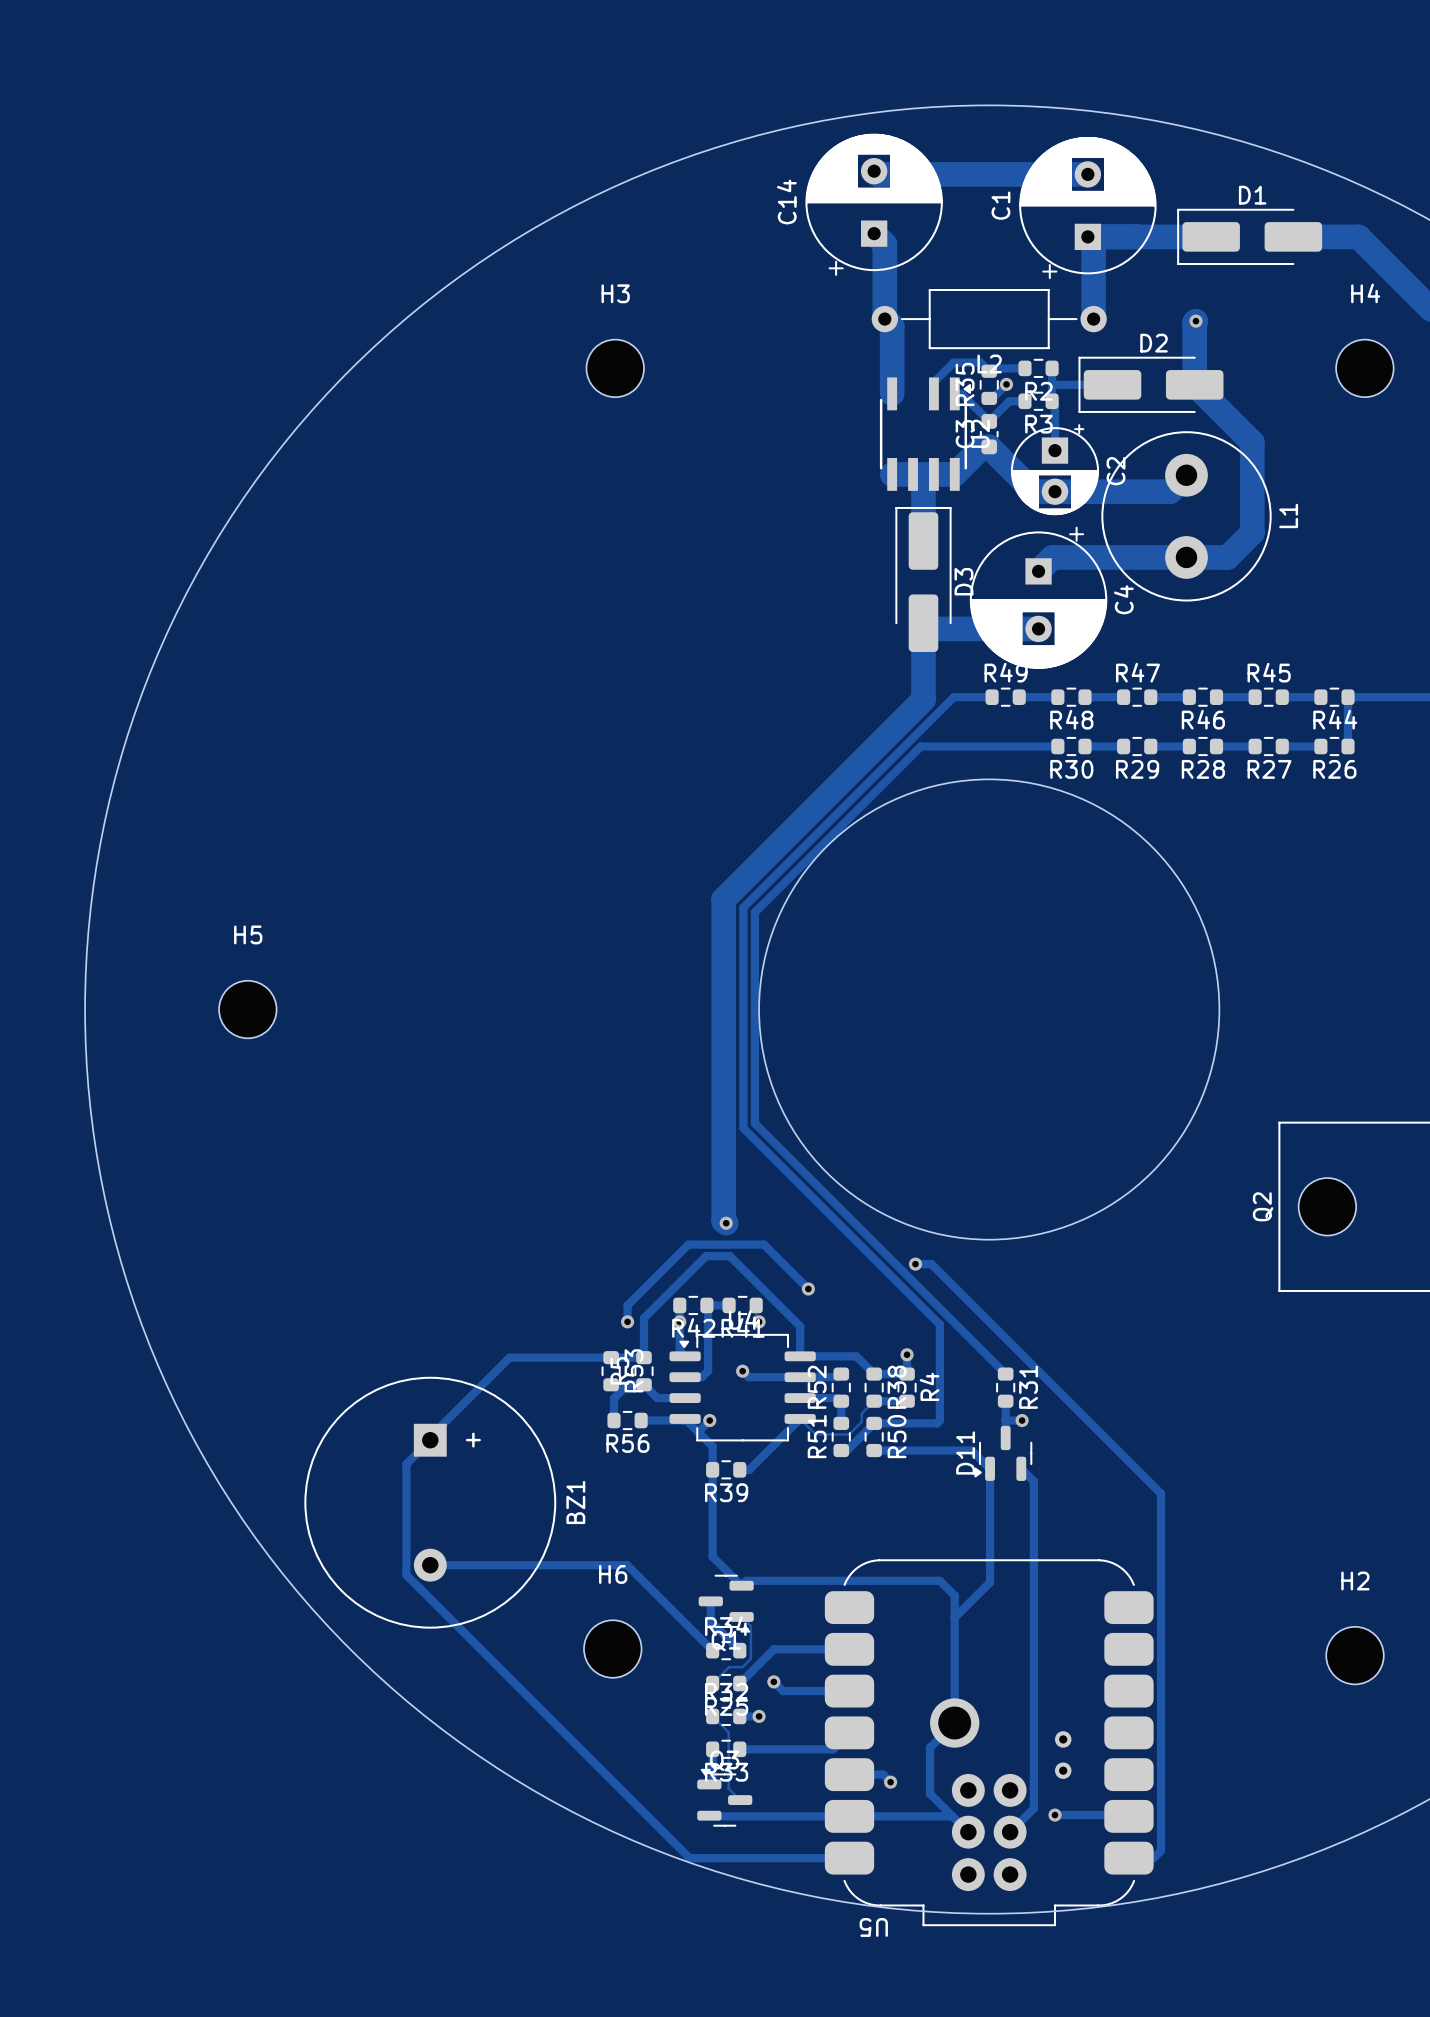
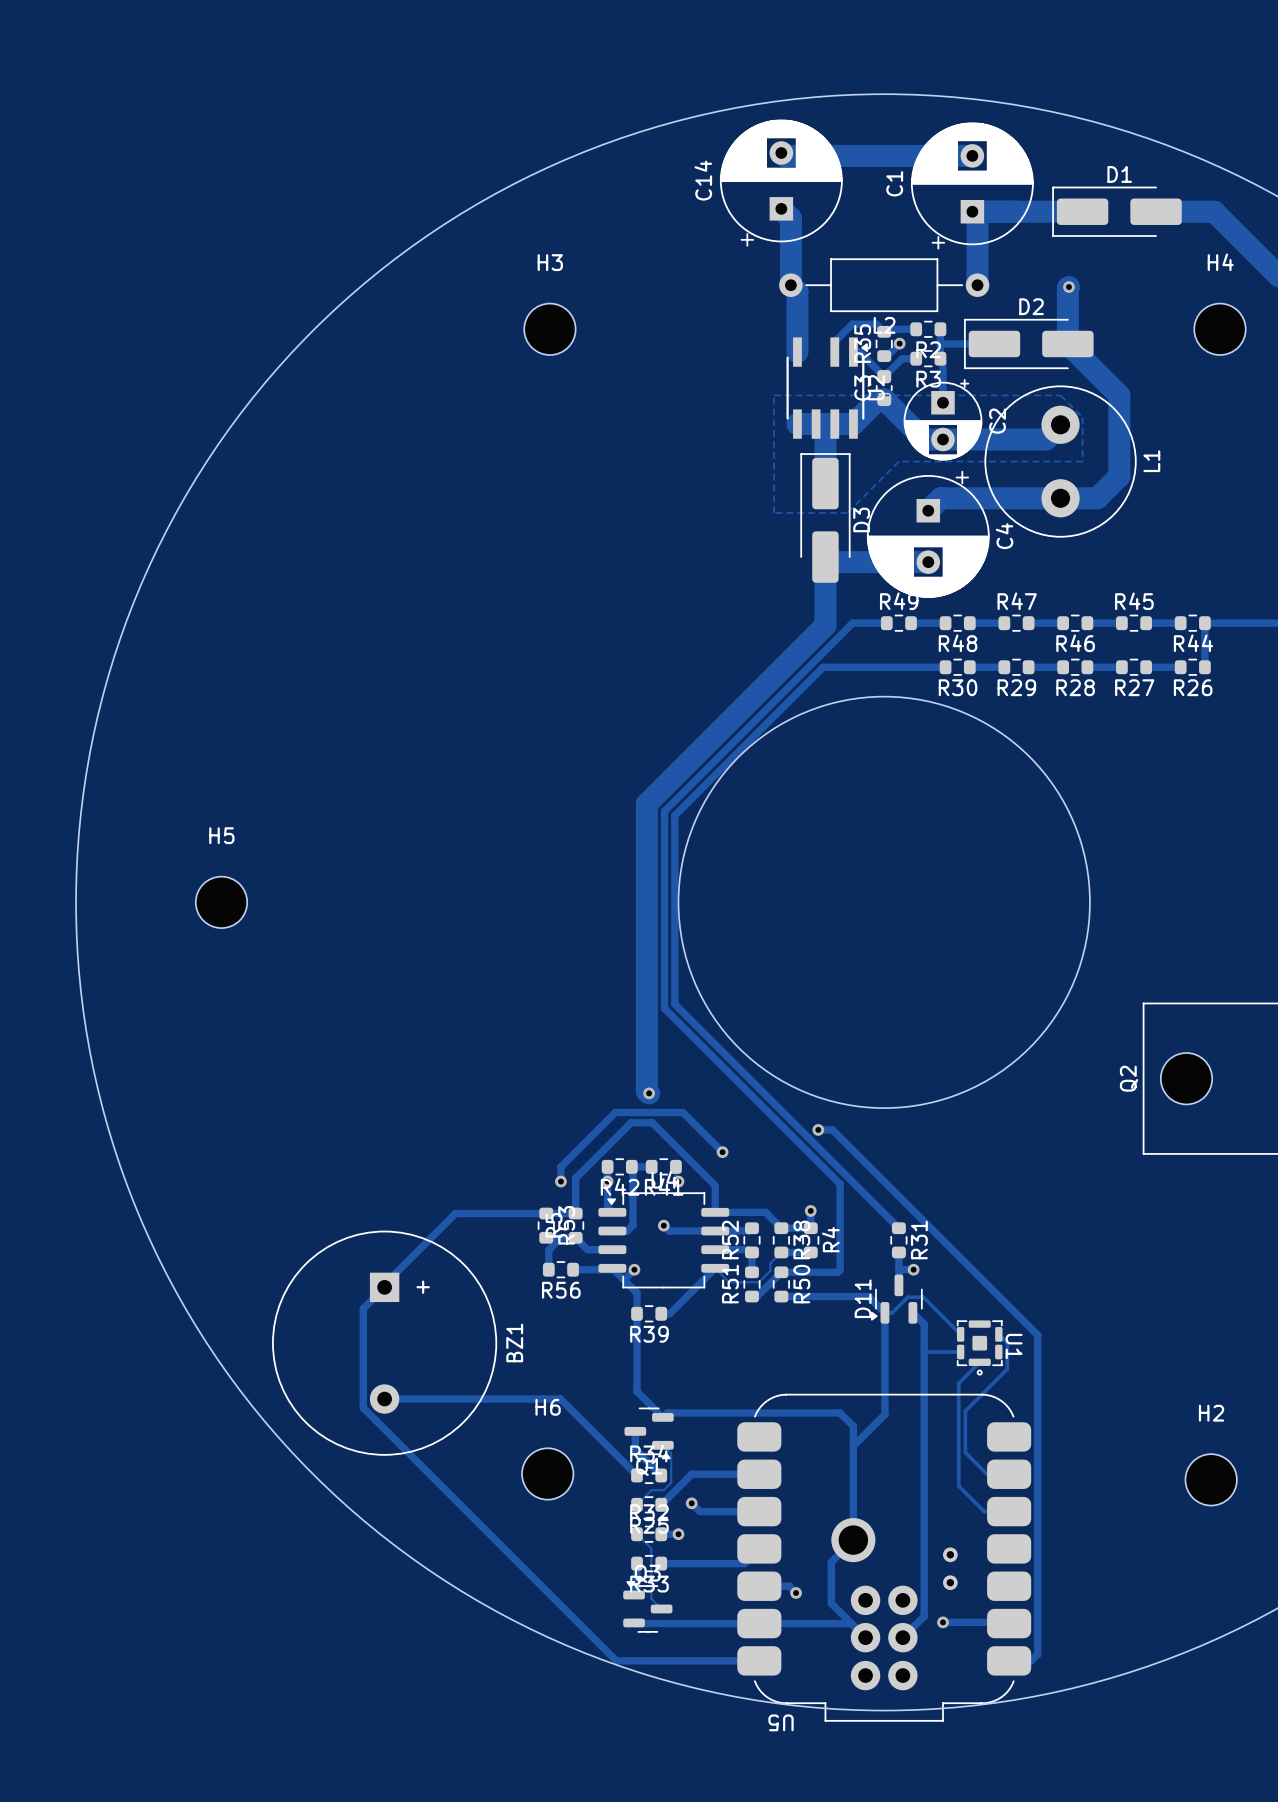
zone outline: none -> (774, 395) (1060, 395) (1082, 417) (1082, 461) (898, 461) (847, 512) (774, 512) (774, 395)
track: none -> (884, 1312) (892, 1312) (907, 1297) (923, 1297) (960, 1334)
track: none -> (998, 1334) (1007, 1342) (1007, 1369) (965, 1411) (965, 1452) (987, 1474) (1009, 1474)
U1: none -> (979, 1347)
track: none -> (924, 1351) (960, 1352)
track: none -> (979, 1362) (958, 1383) (958, 1486) (984, 1511) (1009, 1511)

